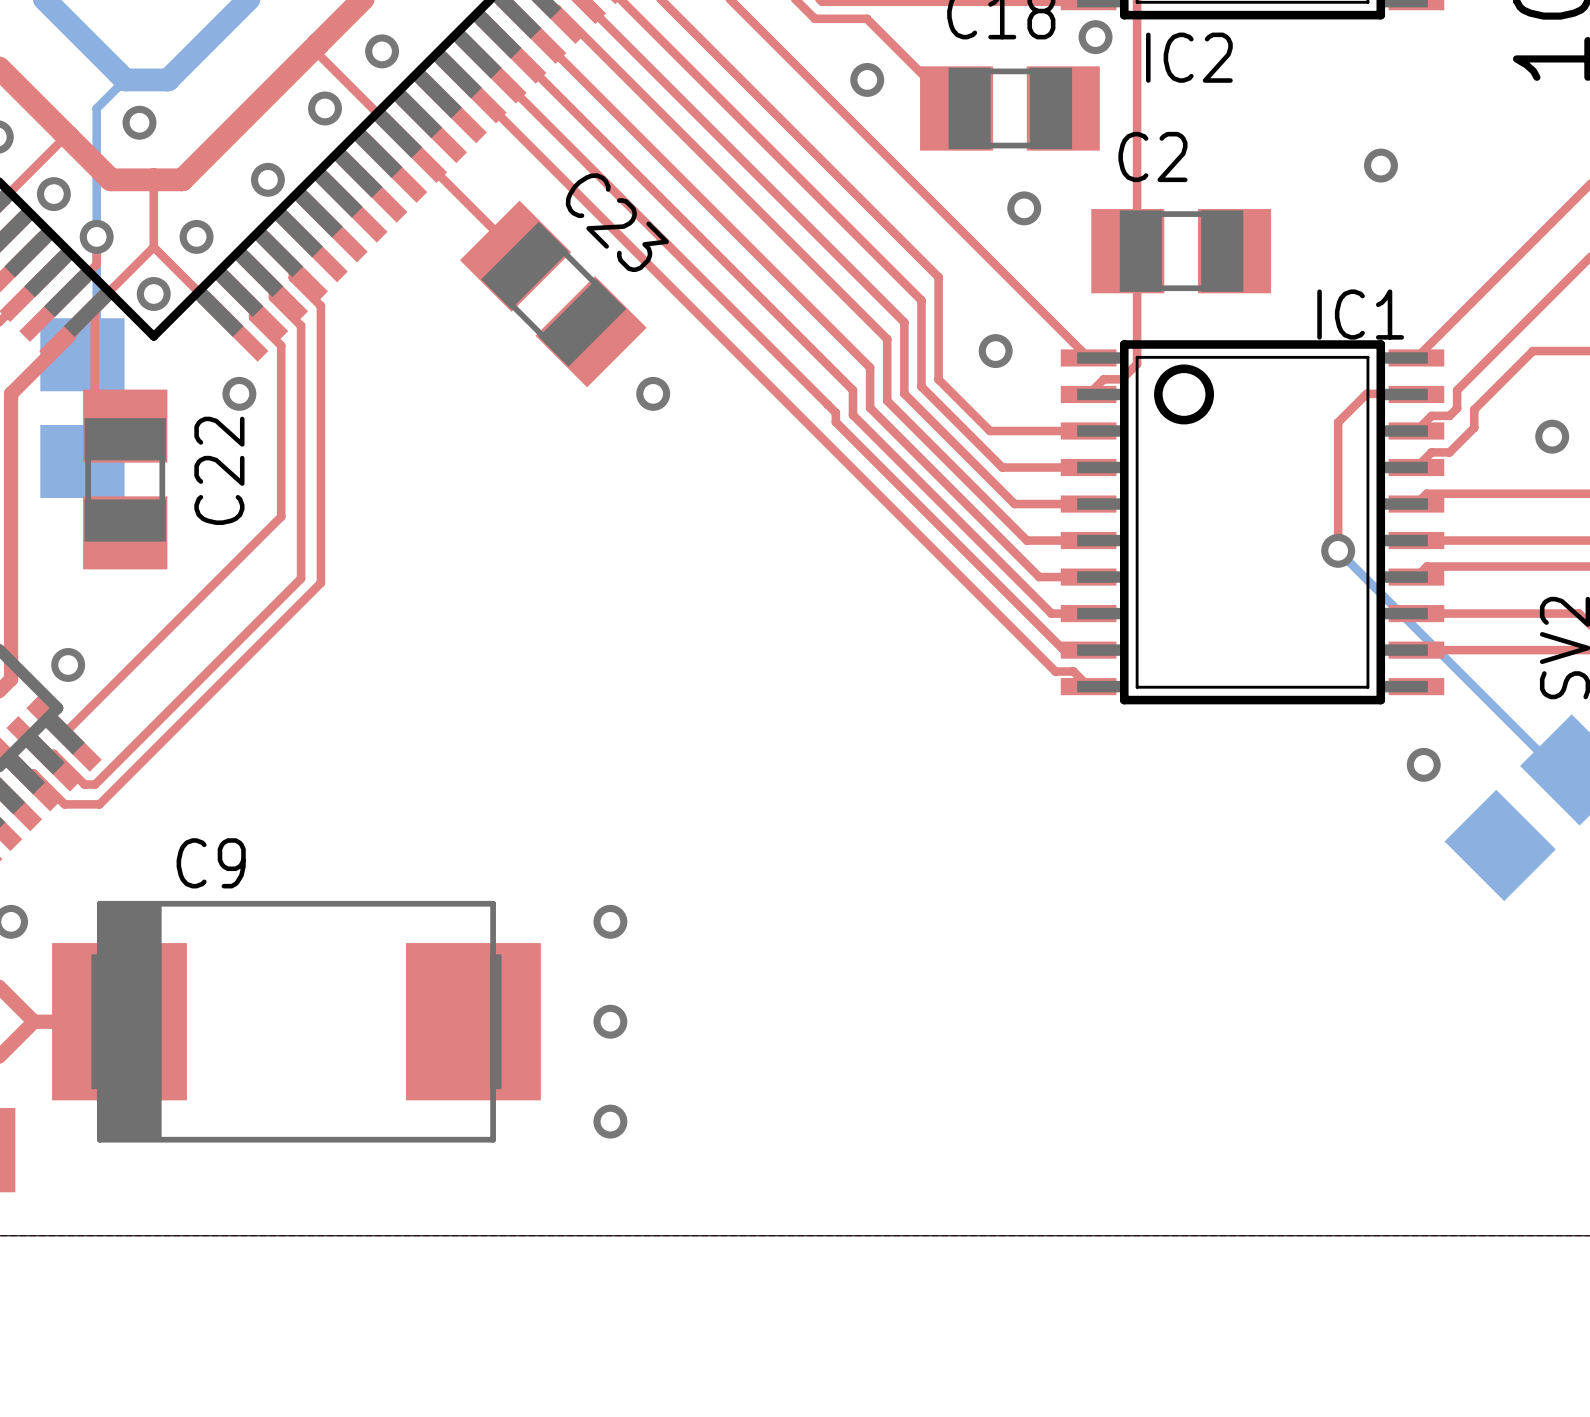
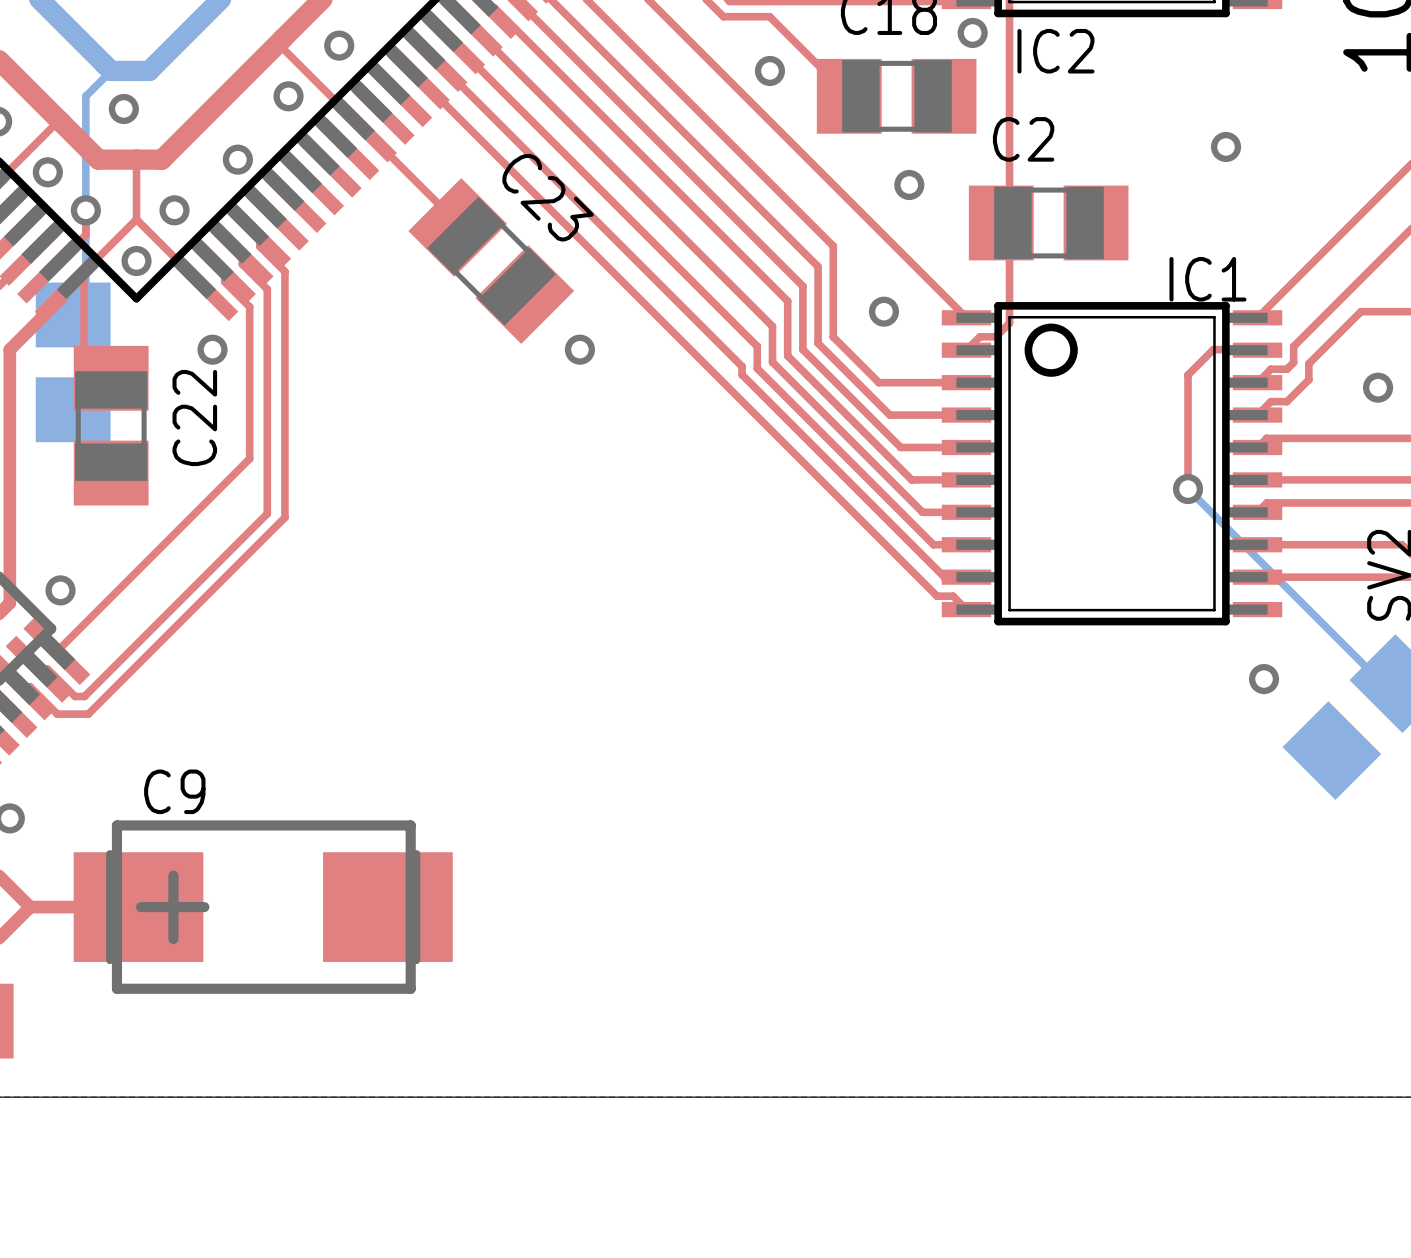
C9 footprint: [52, 900, 541, 1143] -> [73, 820, 453, 994]
via: (610, 921) -> none
via: (610, 1021) -> none
via: (610, 1121) -> none

